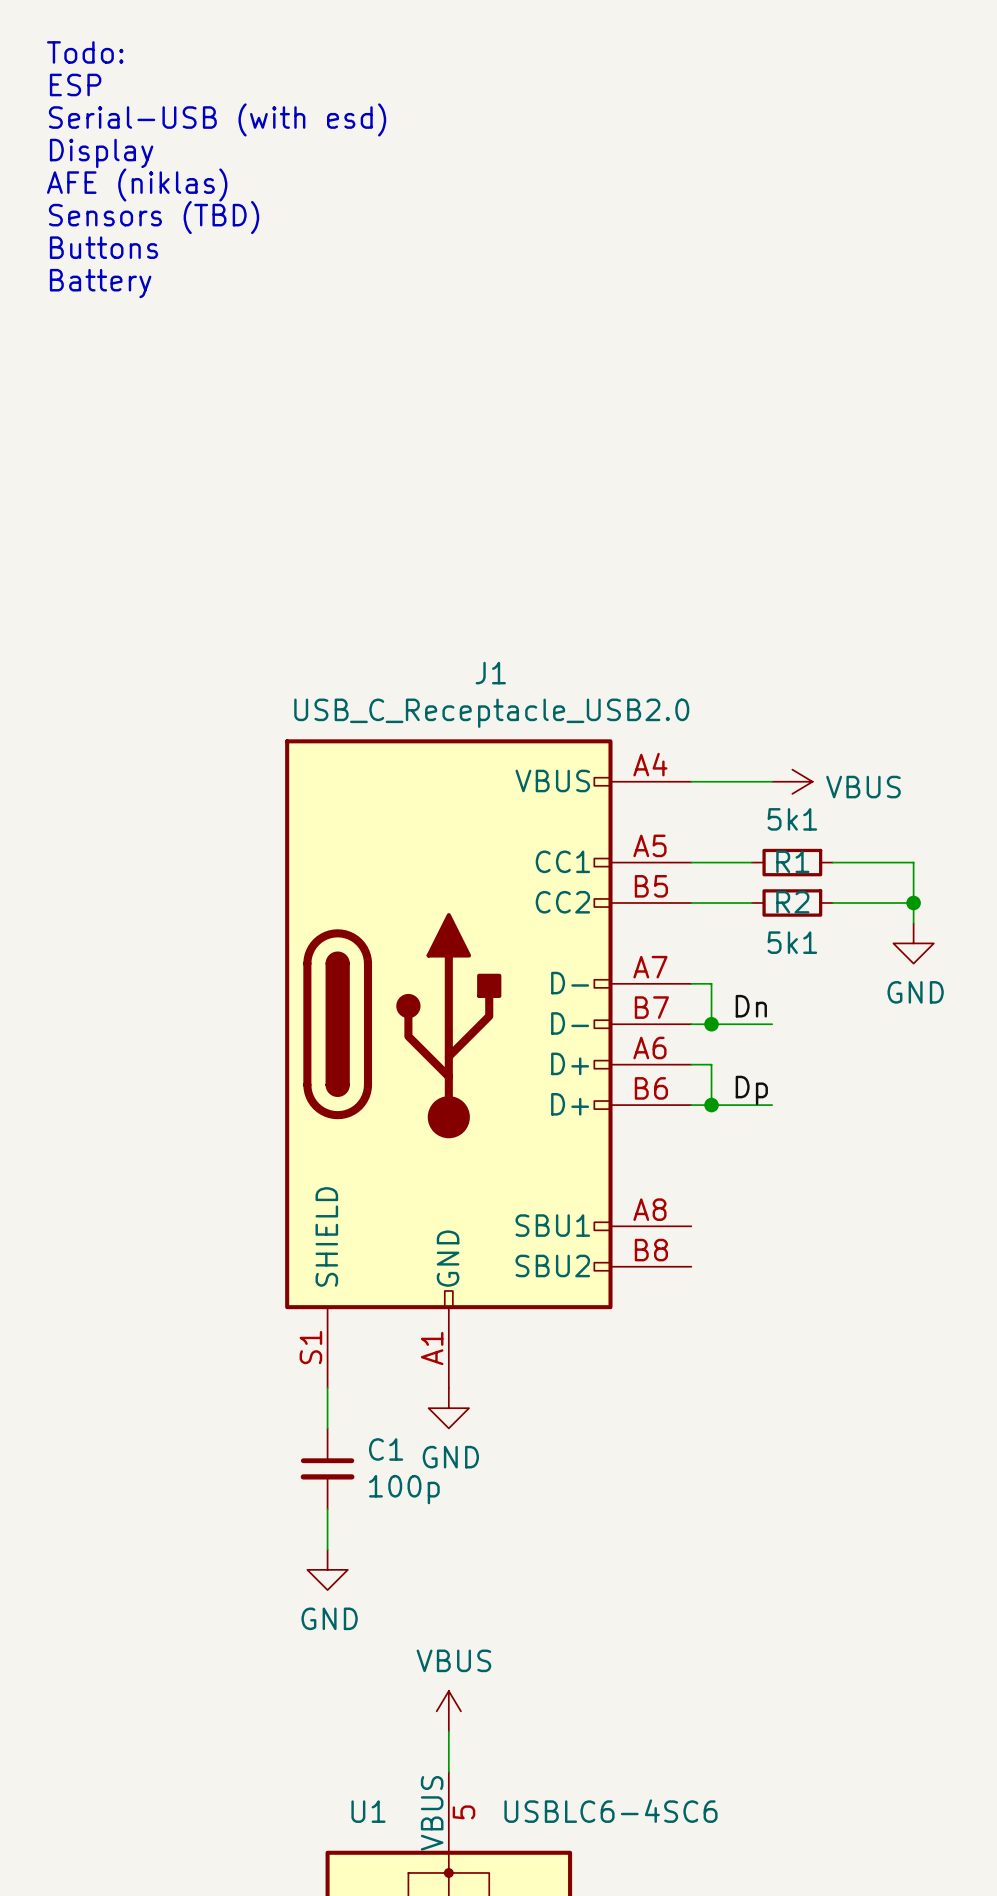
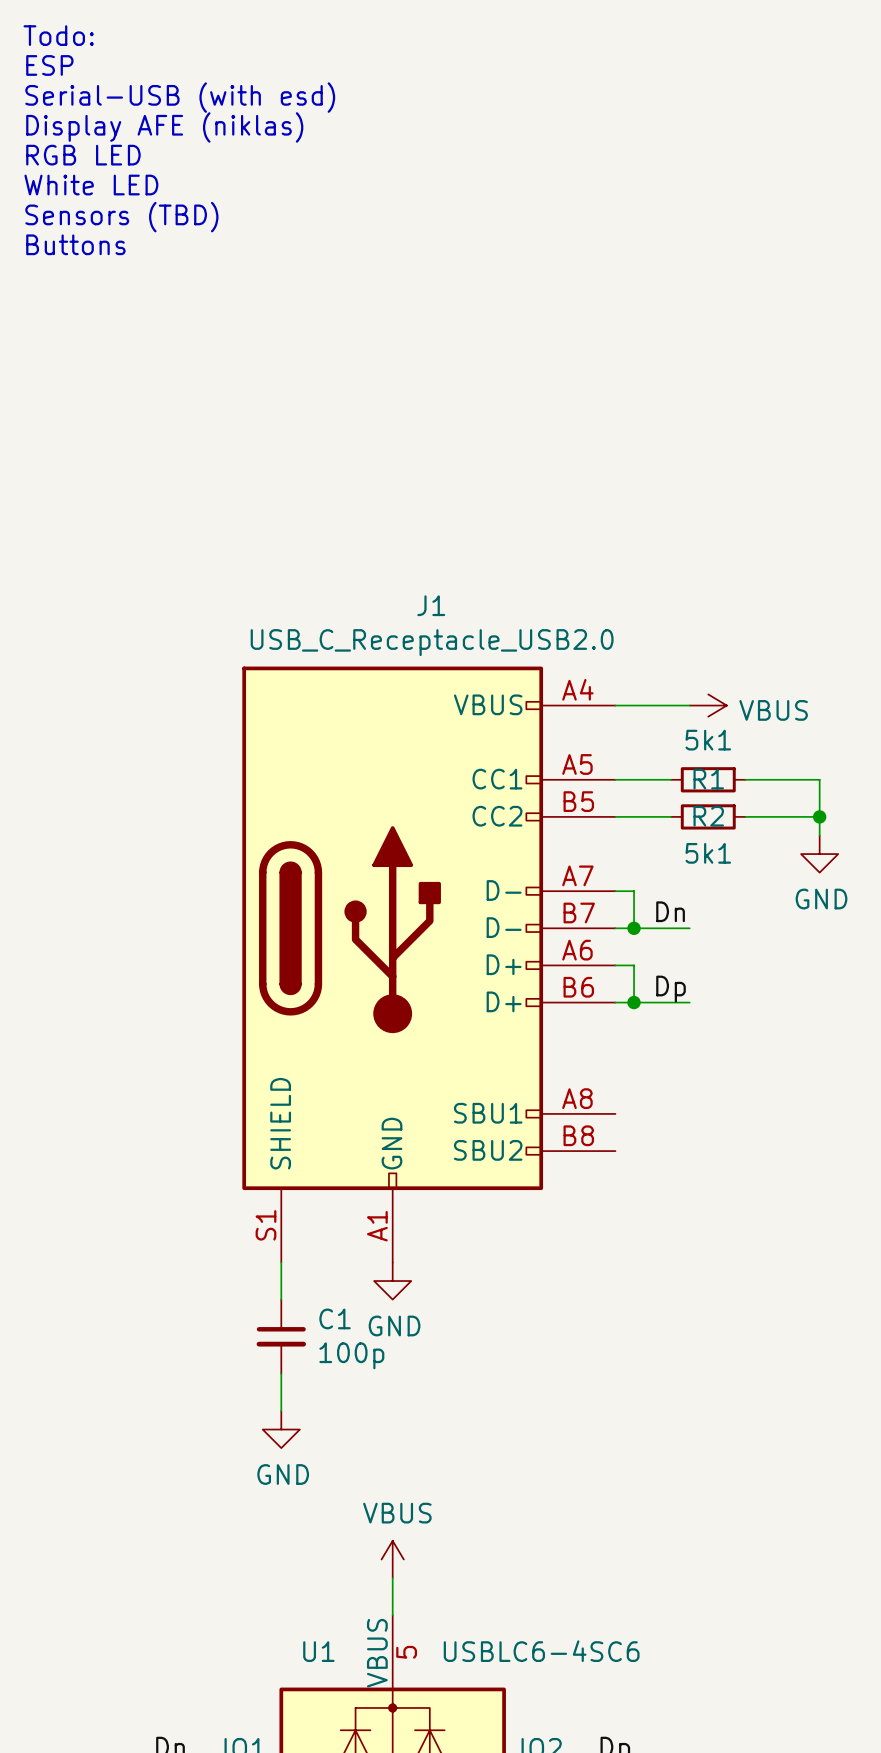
text: Display (101, 153) -> Display AFE (niklas) (164, 127)
text: AFE (niklas) (137, 184) -> RGB LED (83, 155)
text: Sensors (TBD) (154, 217) -> White LED (91, 185)
text: Buttons (103, 247) -> Sensors (TBD) (121, 217)
text: Battery (100, 283) -> Buttons (75, 244)

